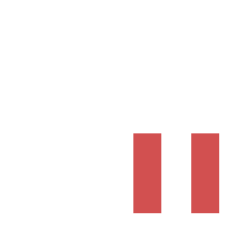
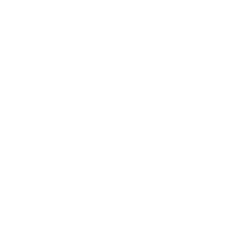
part: (176, 173) -> none

